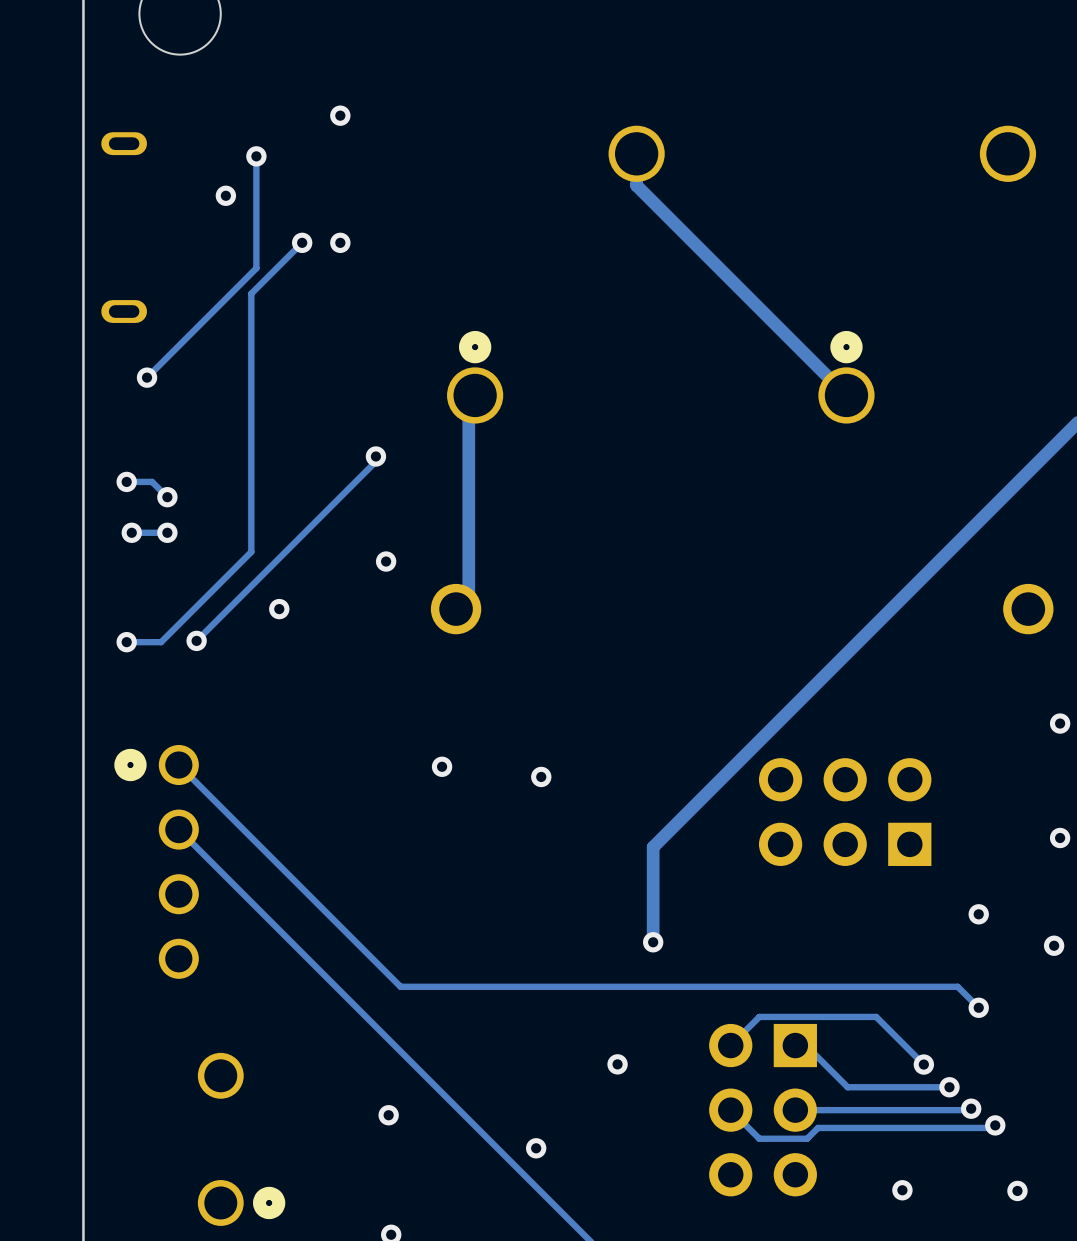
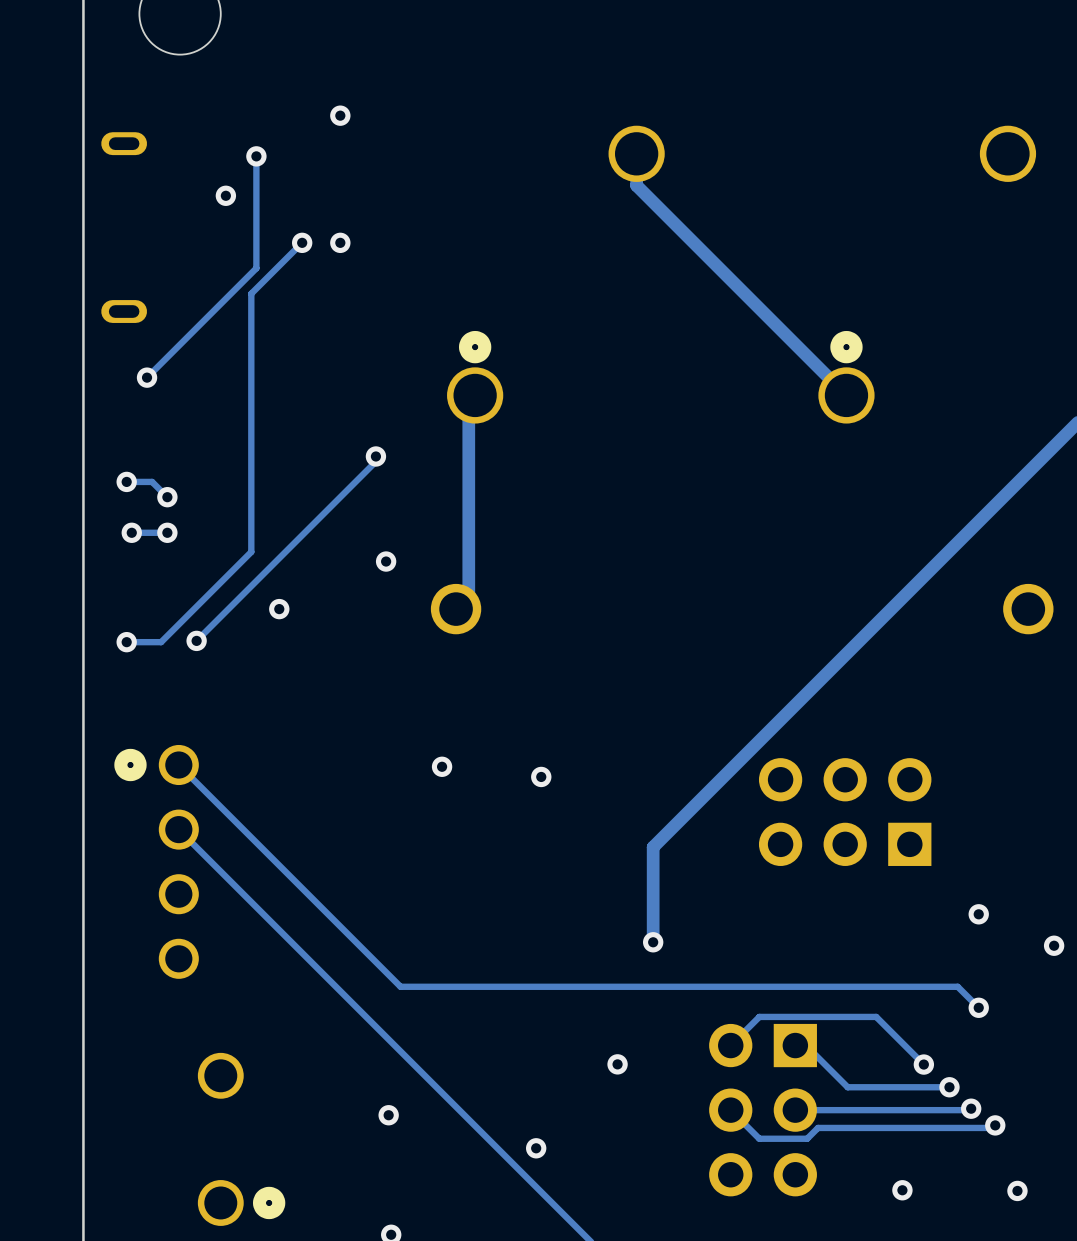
via: (1060, 723) -> none
via: (1060, 838) -> none

